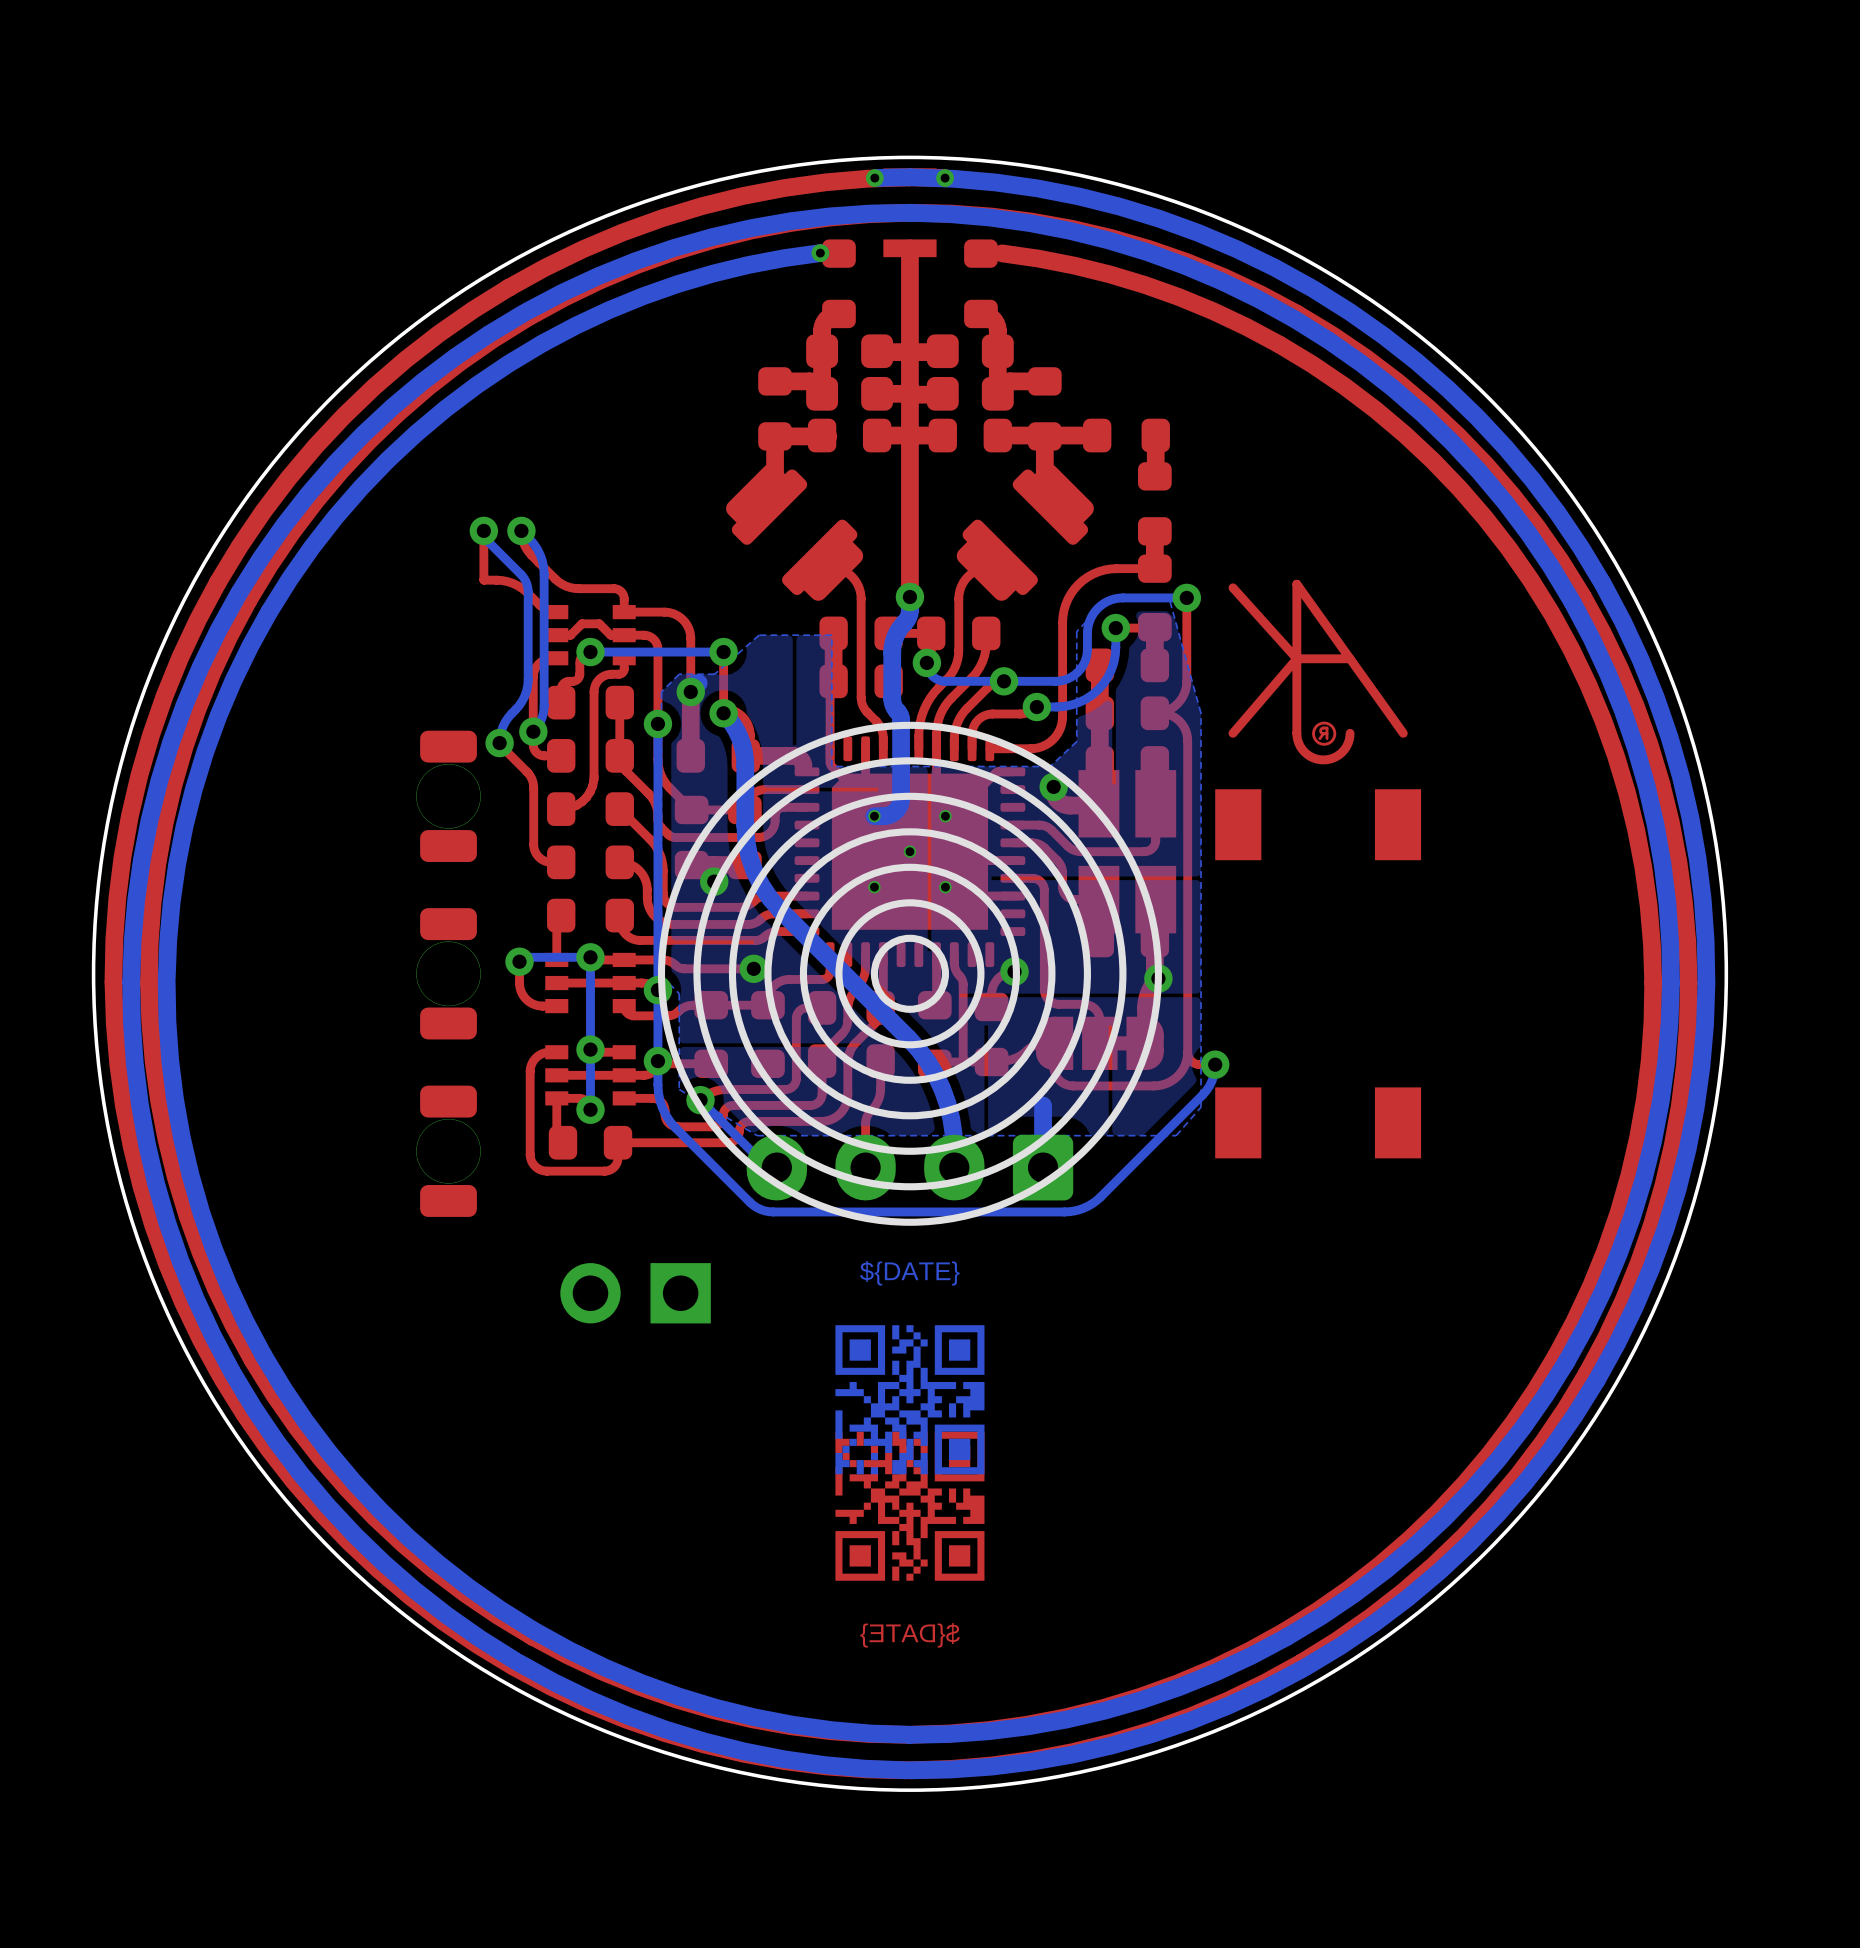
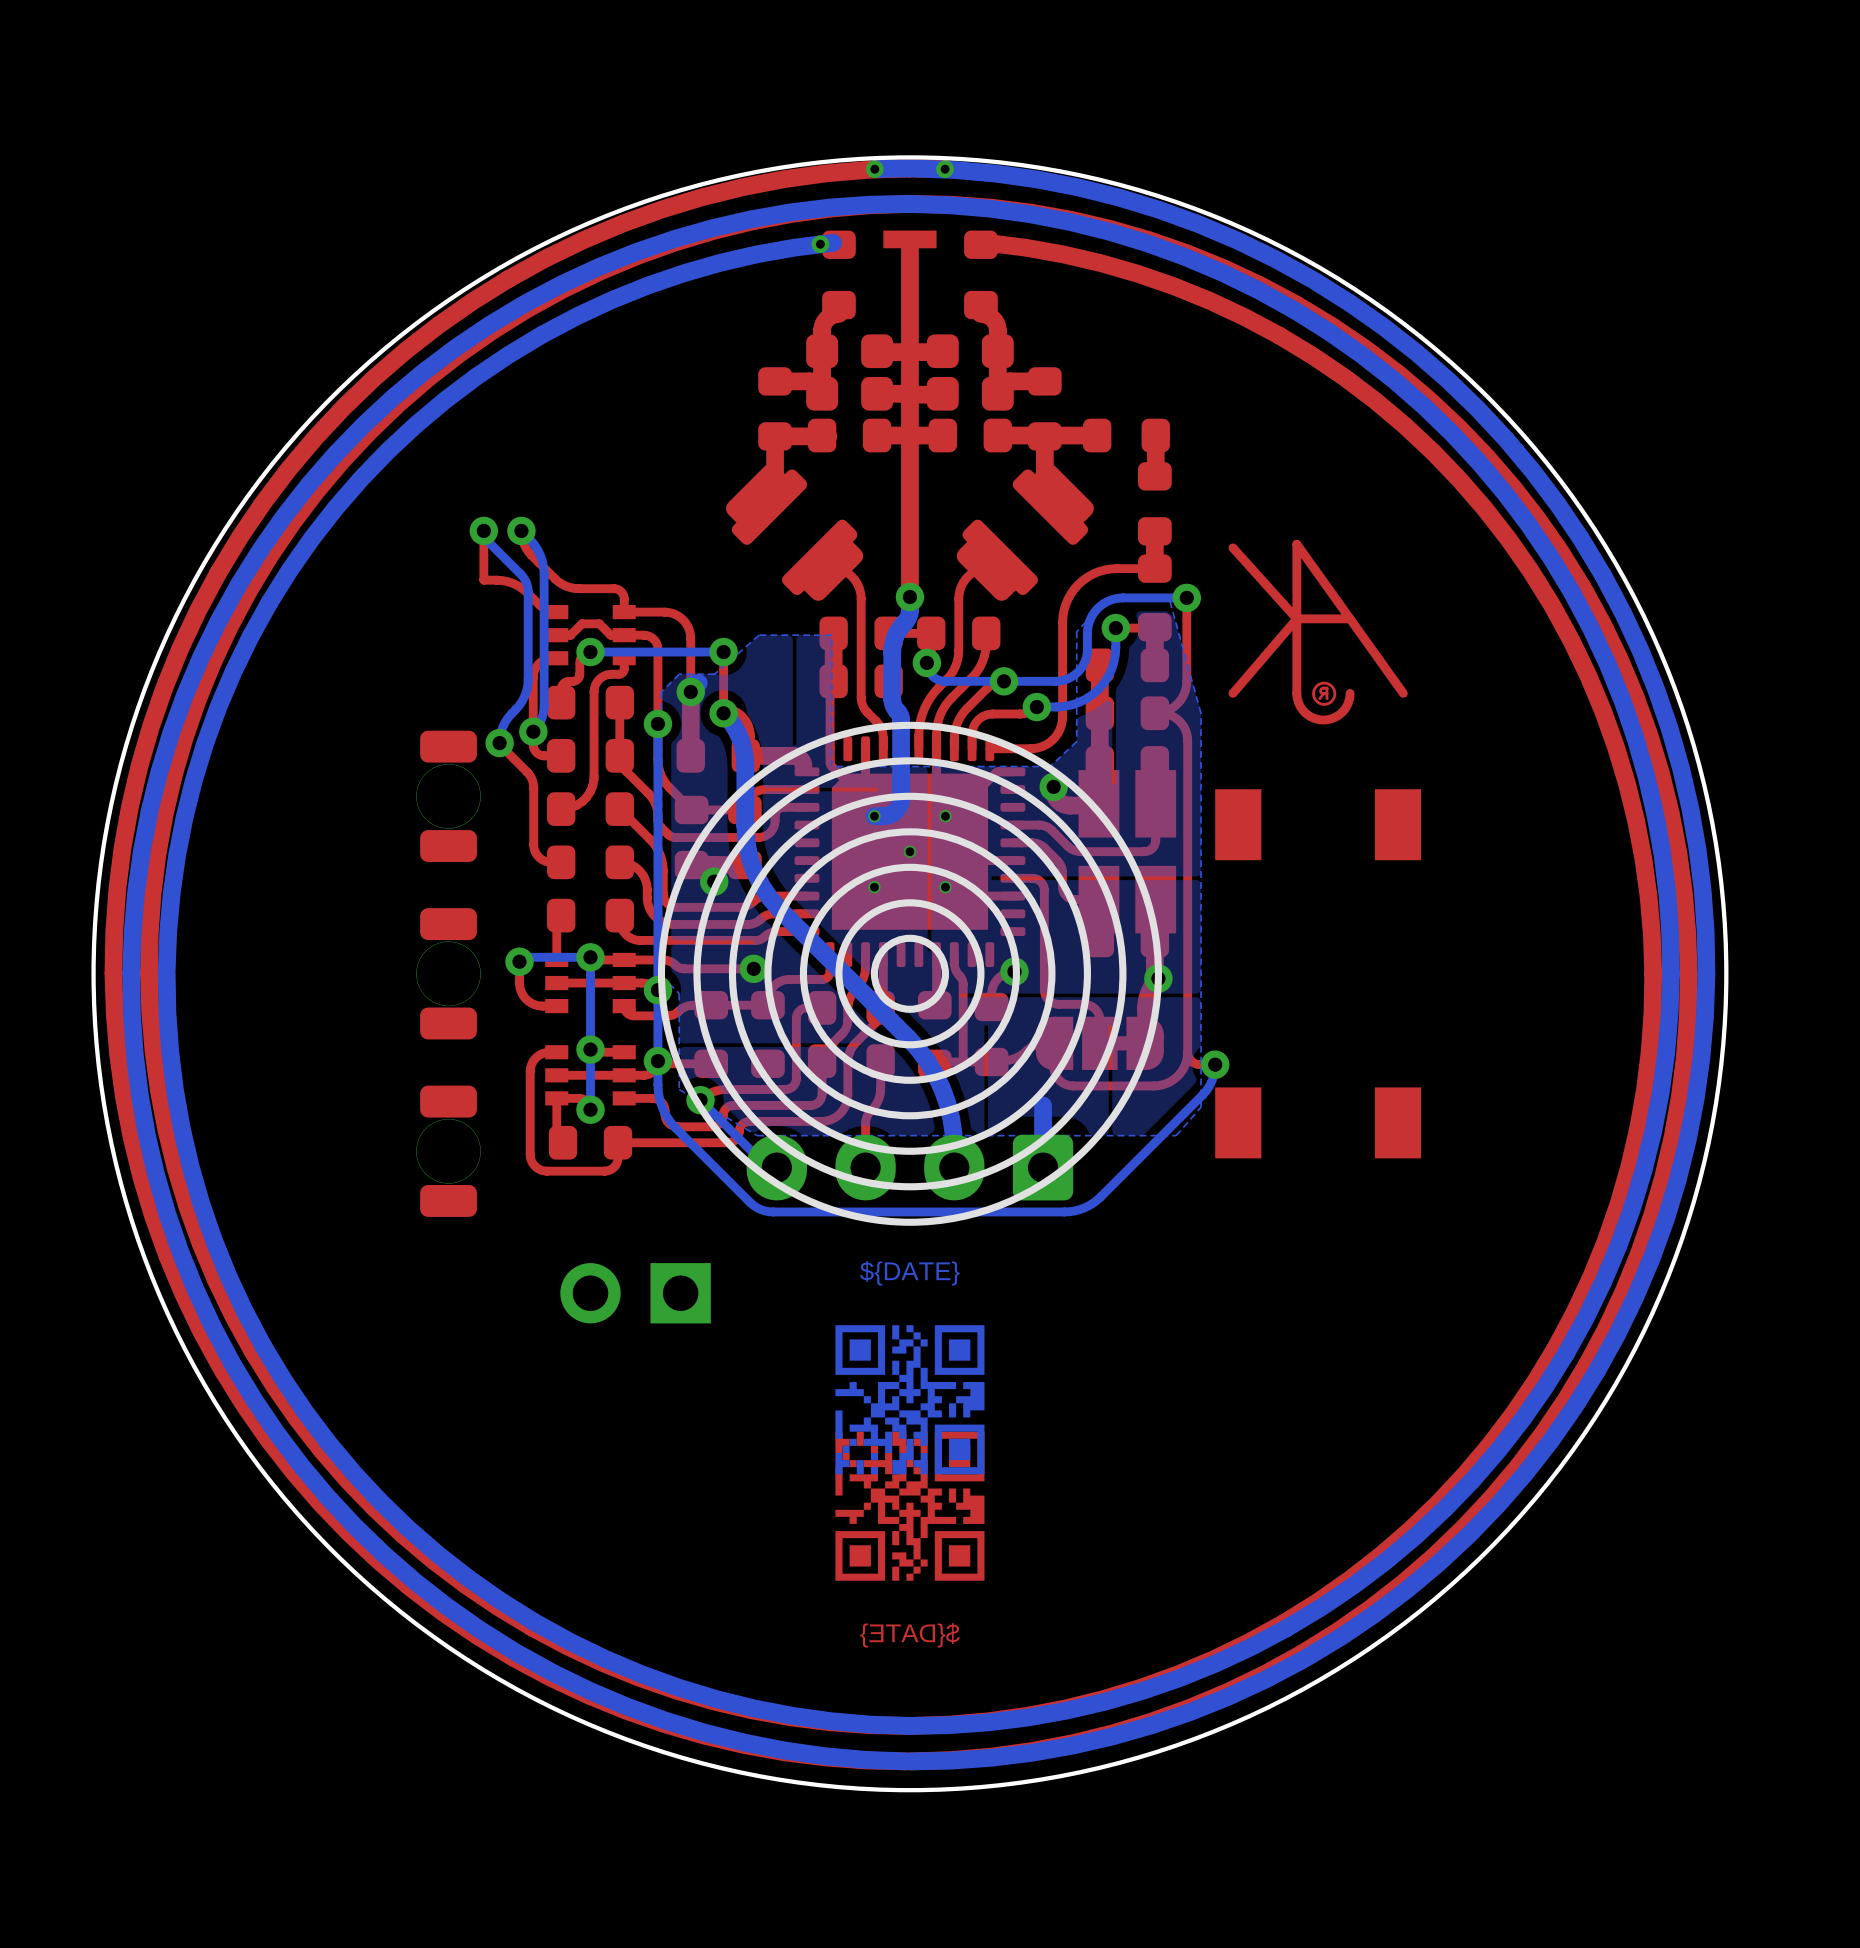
part footprint: [91, 155, 1729, 1792] -> [91, 155, 1729, 1793]
drawing position: (1318, 672) -> (1318, 632)

